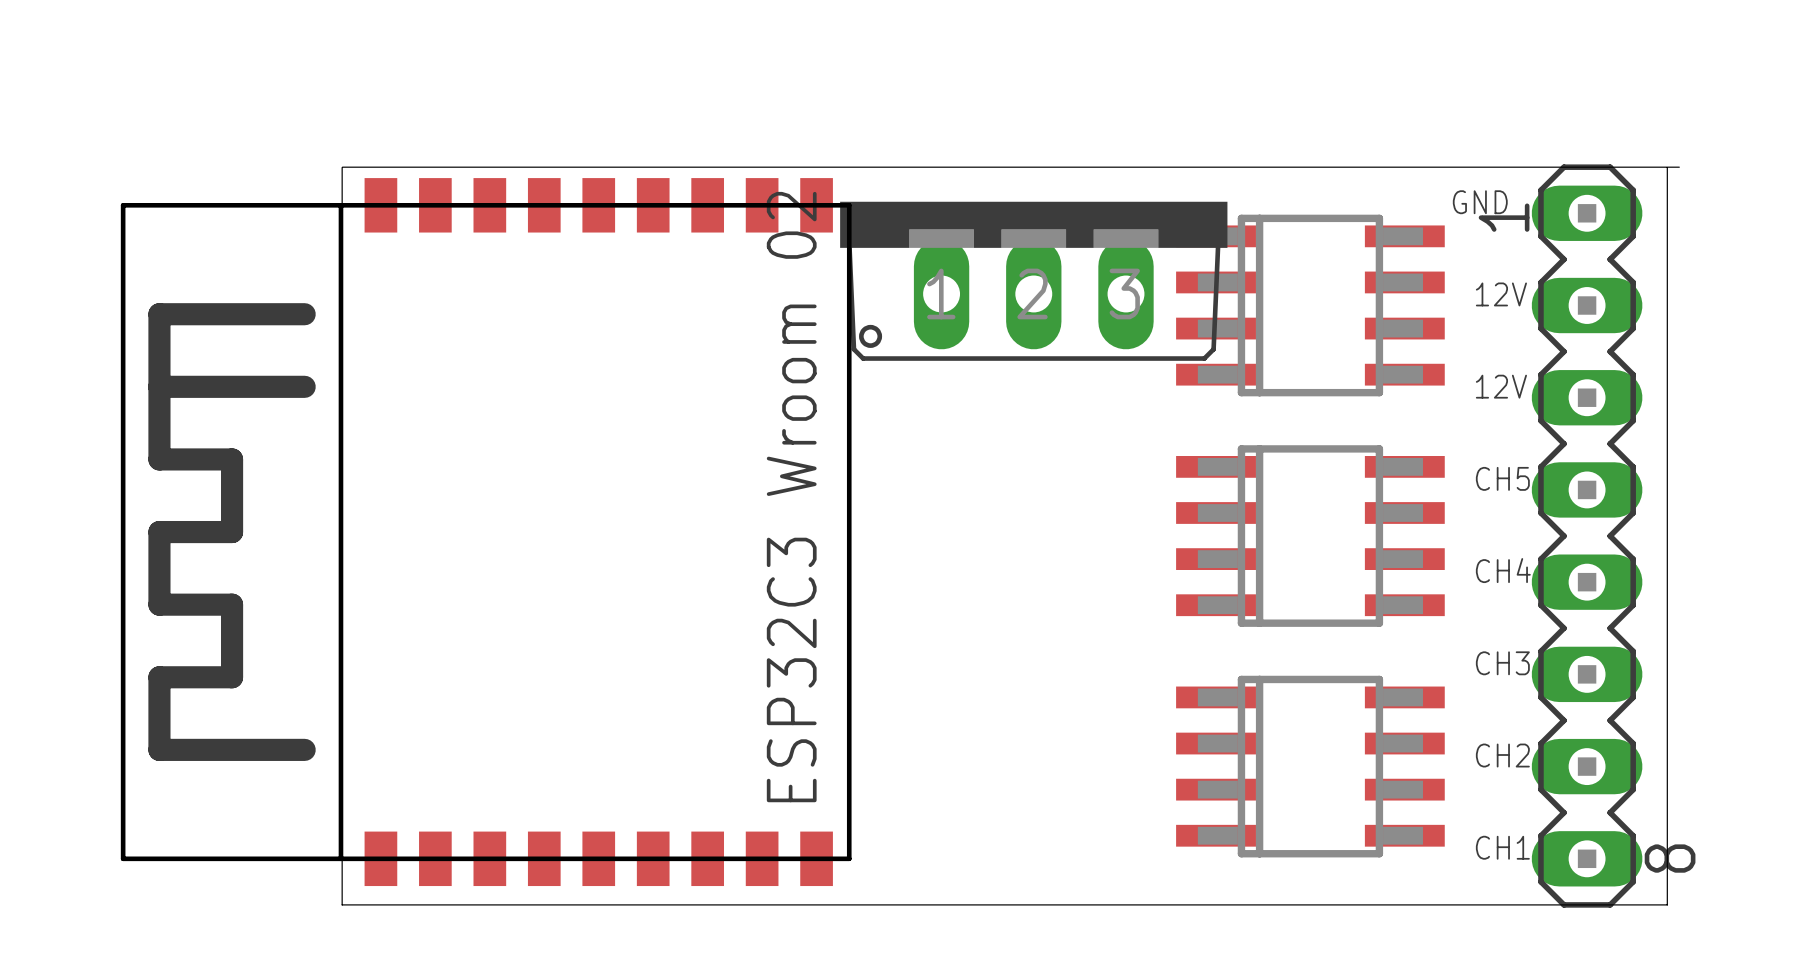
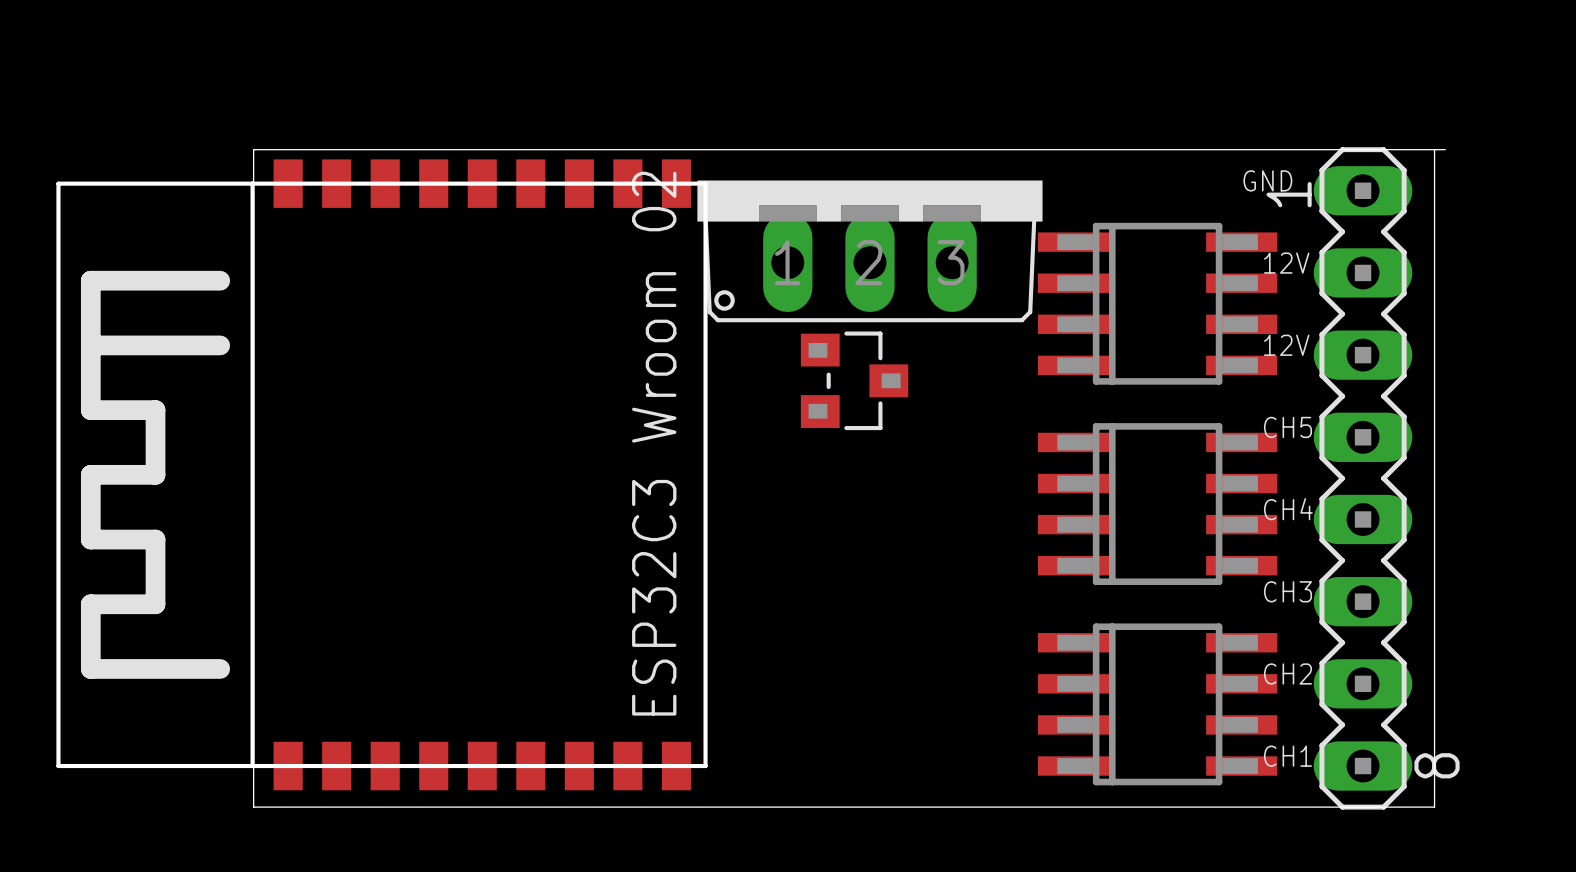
part position: (1310, 305) -> (1157, 303)
part: none -> (854, 380)
part position: (1310, 536) -> (1157, 504)
part position: (1310, 766) -> (1157, 704)

